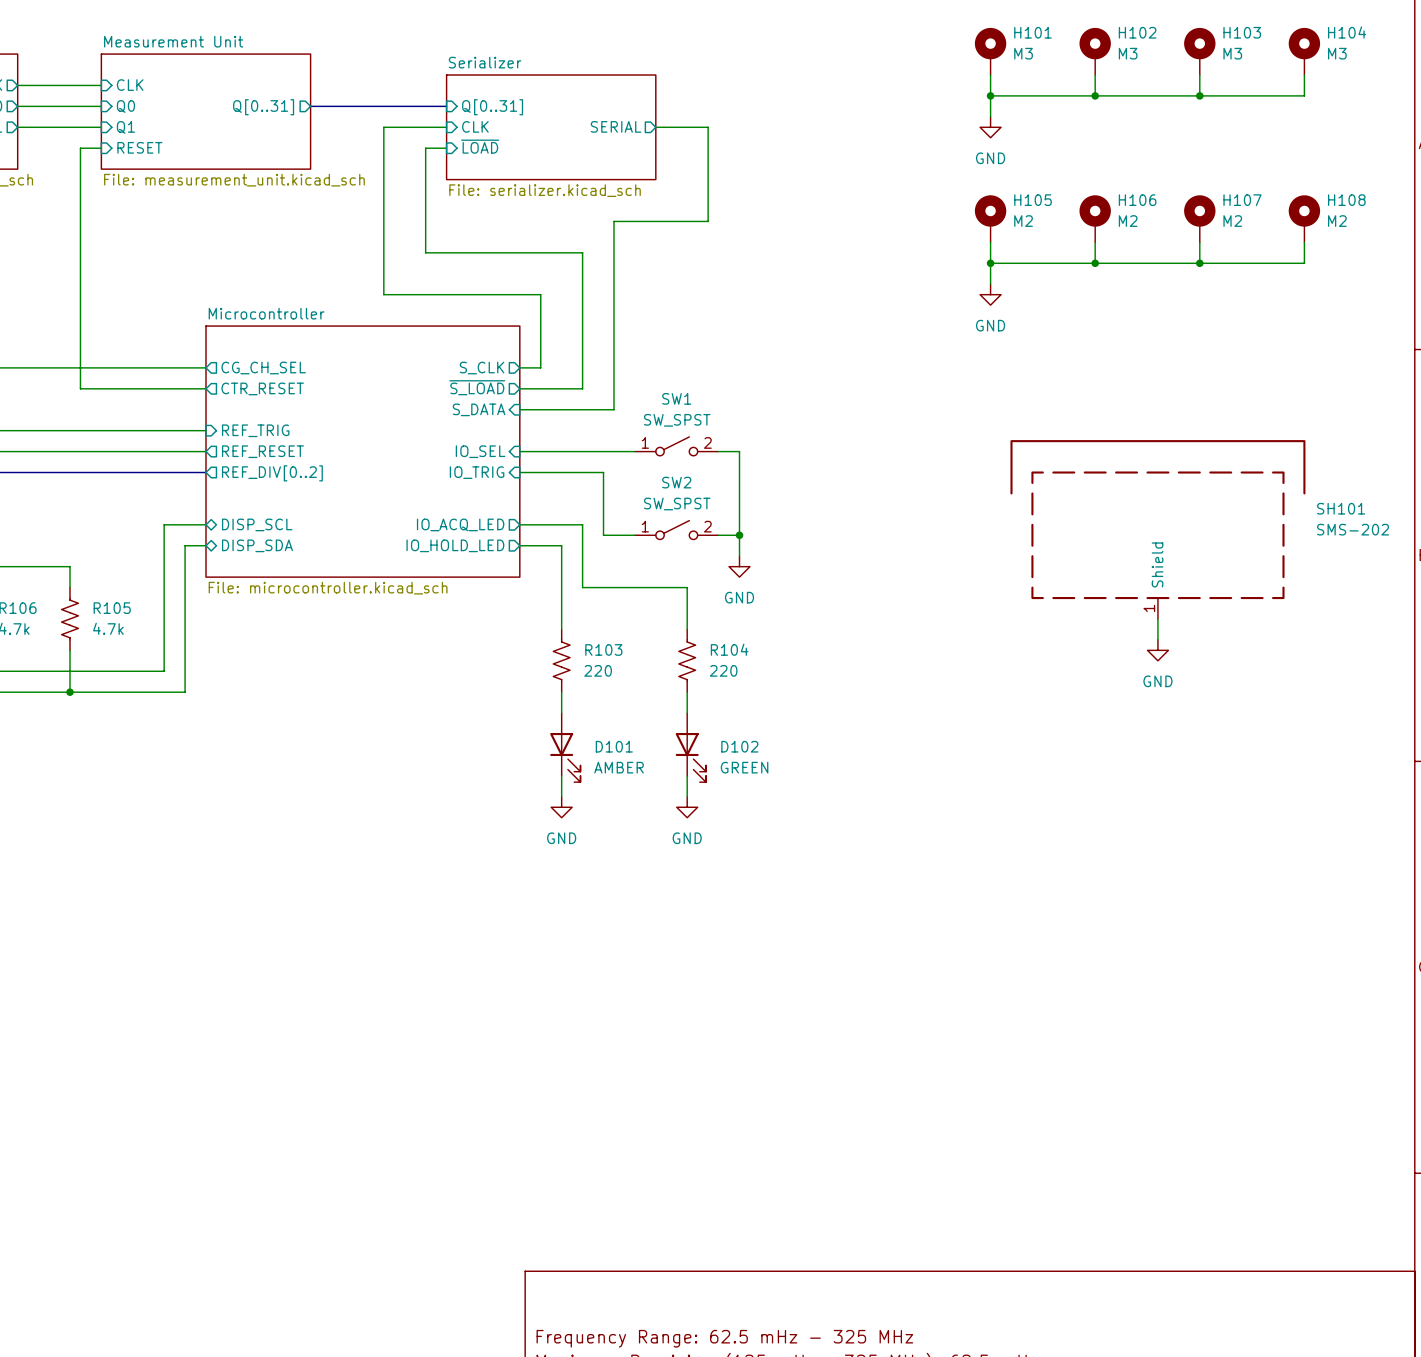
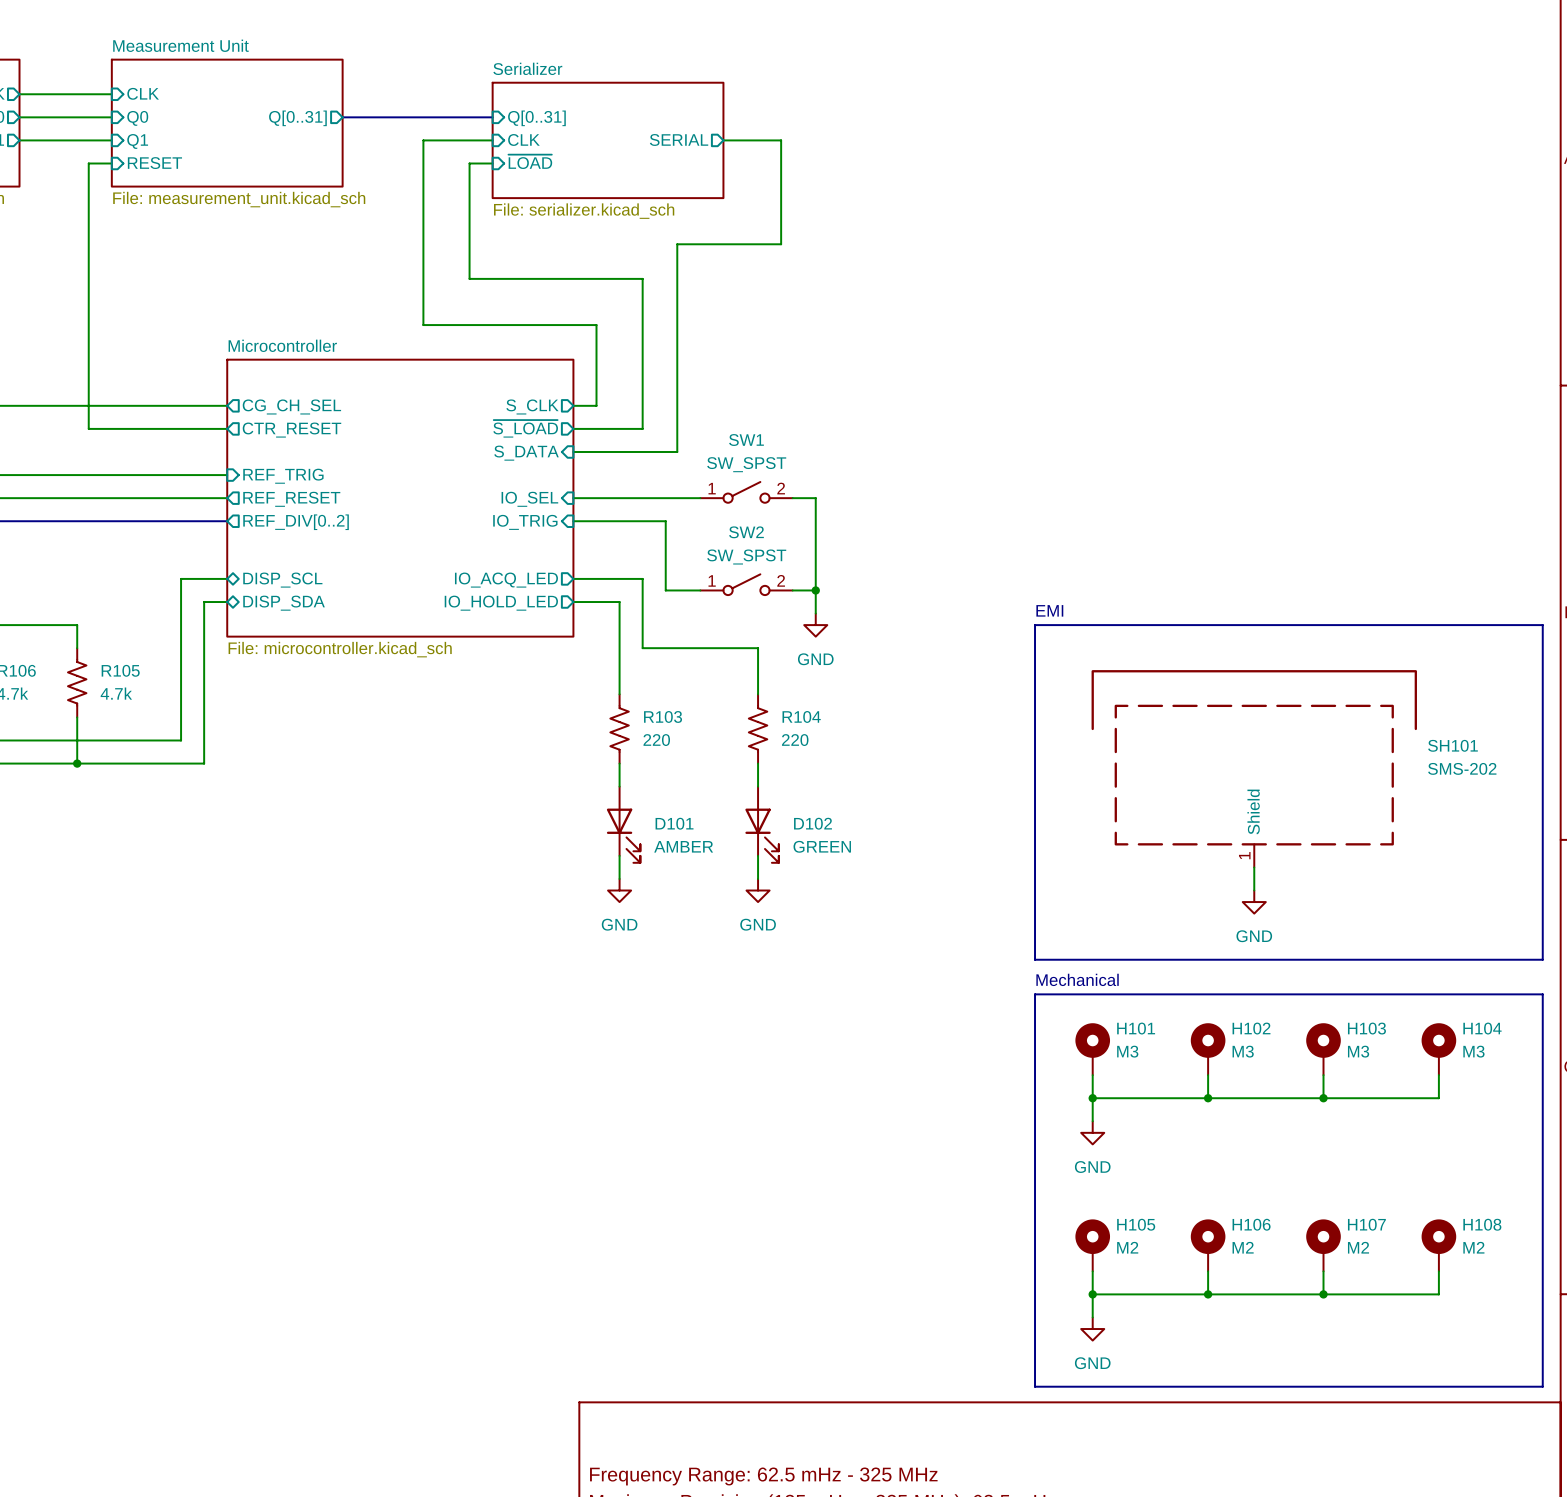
H101 position: (990, 51) -> (1092, 1049)
H102 position: (1095, 51) -> (1208, 1049)
H103 position: (1199, 51) -> (1323, 1049)
H104 position: (1304, 51) -> (1438, 1049)
wire: (990, 74) (990, 116) -> none
wire: (1095, 74) (1095, 95) -> none
wire: (1199, 74) (1199, 95) -> none
wire: (1304, 74) (1304, 95) (990, 95) -> none
junction: (990, 95) -> none
junction: (1095, 95) -> none
junction: (1199, 95) -> none
power symbol: GND (990, 127) -> none
H105 position: (990, 218) -> (1092, 1245)
H106 position: (1095, 218) -> (1208, 1245)
H107 position: (1199, 218) -> (1323, 1245)
H108 position: (1304, 218) -> (1438, 1245)
wire: (990, 242) (990, 284) -> none
wire: (1095, 242) (1095, 263) -> none
wire: (1199, 242) (1199, 263) -> none
wire: (1304, 242) (1304, 263) (990, 263) -> none
junction: (990, 263) -> none
junction: (1095, 263) -> none
junction: (1199, 263) -> none
power symbol: GND (990, 294) -> none
SH101 position: (1157, 529) -> (1254, 768)
text: none -> EMI (1049, 610)
line: none -> (1035, 625) (1035, 959) (1542, 959) (1542, 625) (1035, 625)
wire: (1157, 618) (1157, 639) -> (1254, 867) (1254, 890)
power symbol position: GND (1157, 650) -> GND (1254, 902)
text: none -> Mechanical (1077, 979)
line: none -> (1035, 994) (1542, 994) (1542, 1386) (1035, 1386) (1035, 994)
wire: none -> (1092, 1075) (1092, 1121)
wire: none -> (1208, 1075) (1208, 1098)
wire: none -> (1323, 1075) (1323, 1098)
wire: none -> (1438, 1075) (1438, 1098) (1092, 1098)
junction: none -> (1092, 1098)
junction: none -> (1208, 1098)
junction: none -> (1323, 1098)
power symbol: none -> GND (1092, 1132)
wire: none -> (1092, 1271) (1092, 1317)
wire: none -> (1208, 1271) (1208, 1294)
wire: none -> (1323, 1271) (1323, 1294)
wire: none -> (1438, 1271) (1438, 1294) (1092, 1294)
junction: none -> (1092, 1294)
junction: none -> (1208, 1294)
junction: none -> (1323, 1294)
power symbol: none -> GND (1092, 1329)

